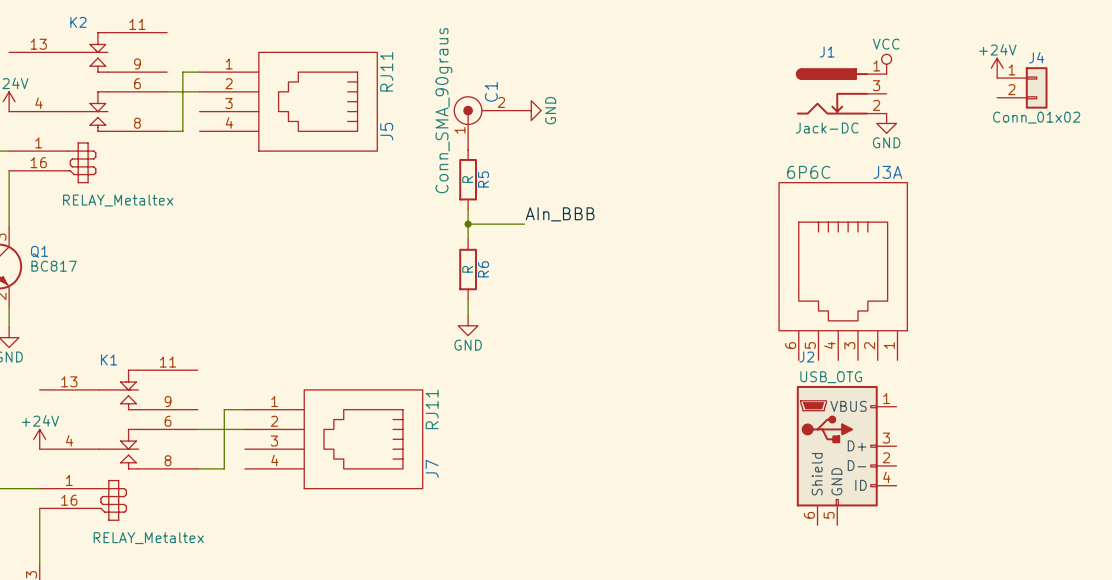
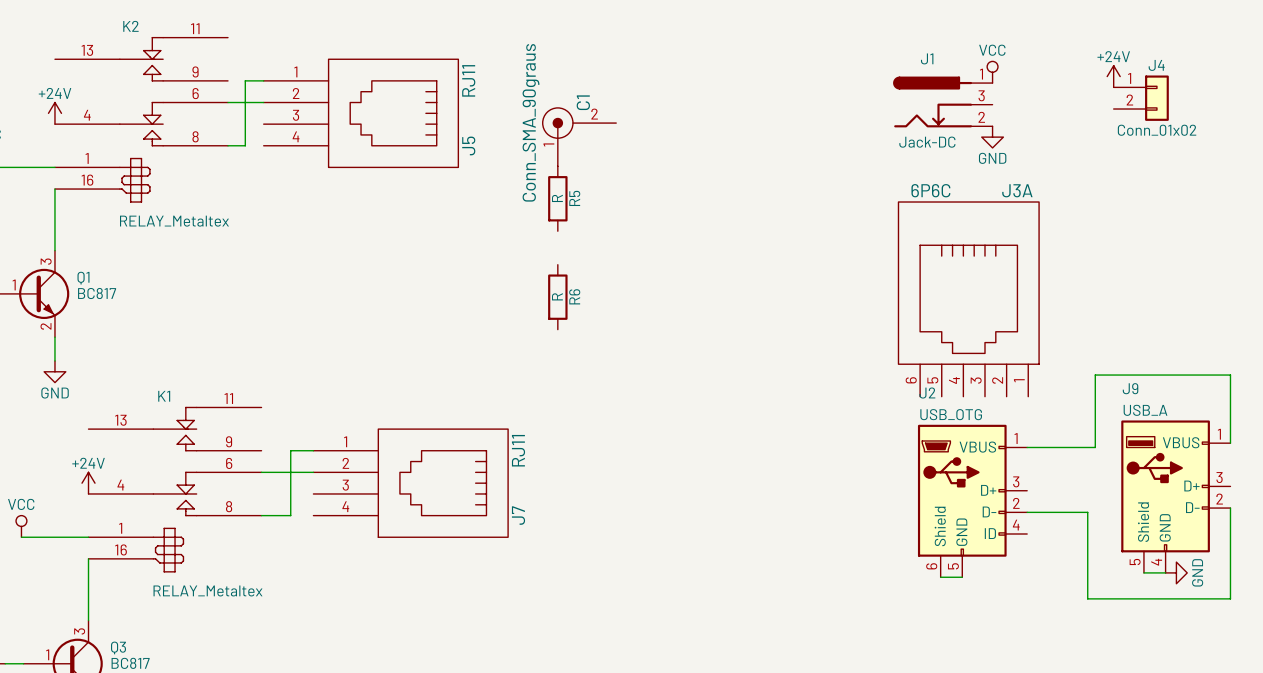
power symbol position: VCC (886, 64) -> VCC (992, 72)
power symbol position: +24V (997, 68) -> +24V (1113, 76)
J4 position: (1022, 87) -> (1141, 98)
J1 position: (841, 91) -> (942, 101)
power symbol: GND (531, 110) -> none
power symbol position: GND (886, 123) -> GND (992, 137)
wire: (468, 209) (468, 239) -> none
label: AIn_BBB (560, 214) -> none
wire: (468, 224) (524, 224) -> none
junction: (468, 224) -> none
wire: (468, 299) (468, 315) -> none
power symbol: GND (468, 325) -> none
wire: none -> (1230, 443) (1230, 375) (1095, 375) (1095, 447) (1027, 447)
J9: none -> USB_A (1175, 496)
wire: none -> (1230, 508) (1230, 598) (1087, 598) (1087, 512) (1027, 512)
wire: none -> (1143, 572) (1165, 572)
power symbol: none -> GND (1176, 572)
wire: none -> (940, 577) (962, 577)

